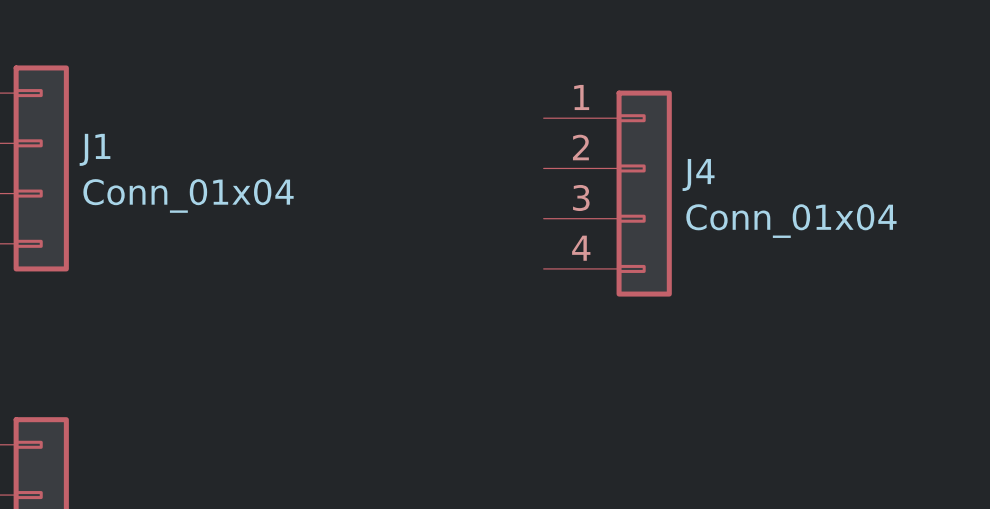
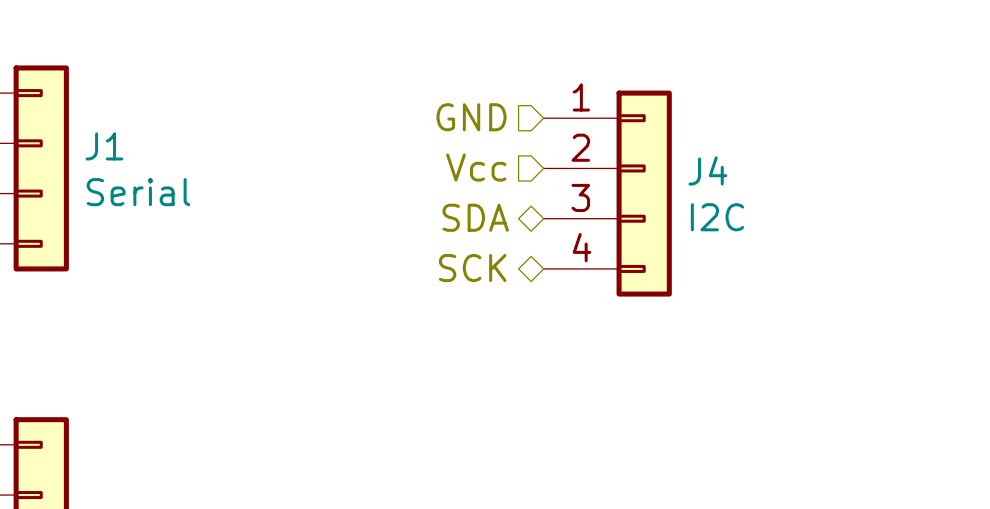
hierarchical label: none -> GND (471, 117)
hierarchical label: none -> Vcc (476, 167)
J1 value: Conn_01x04 (188, 195) -> Serial (138, 192)
hierarchical label: none -> SDA (475, 217)
J4 value: Conn_01x04 (791, 221) -> I2C (717, 217)
hierarchical label: none -> SCK (472, 268)

